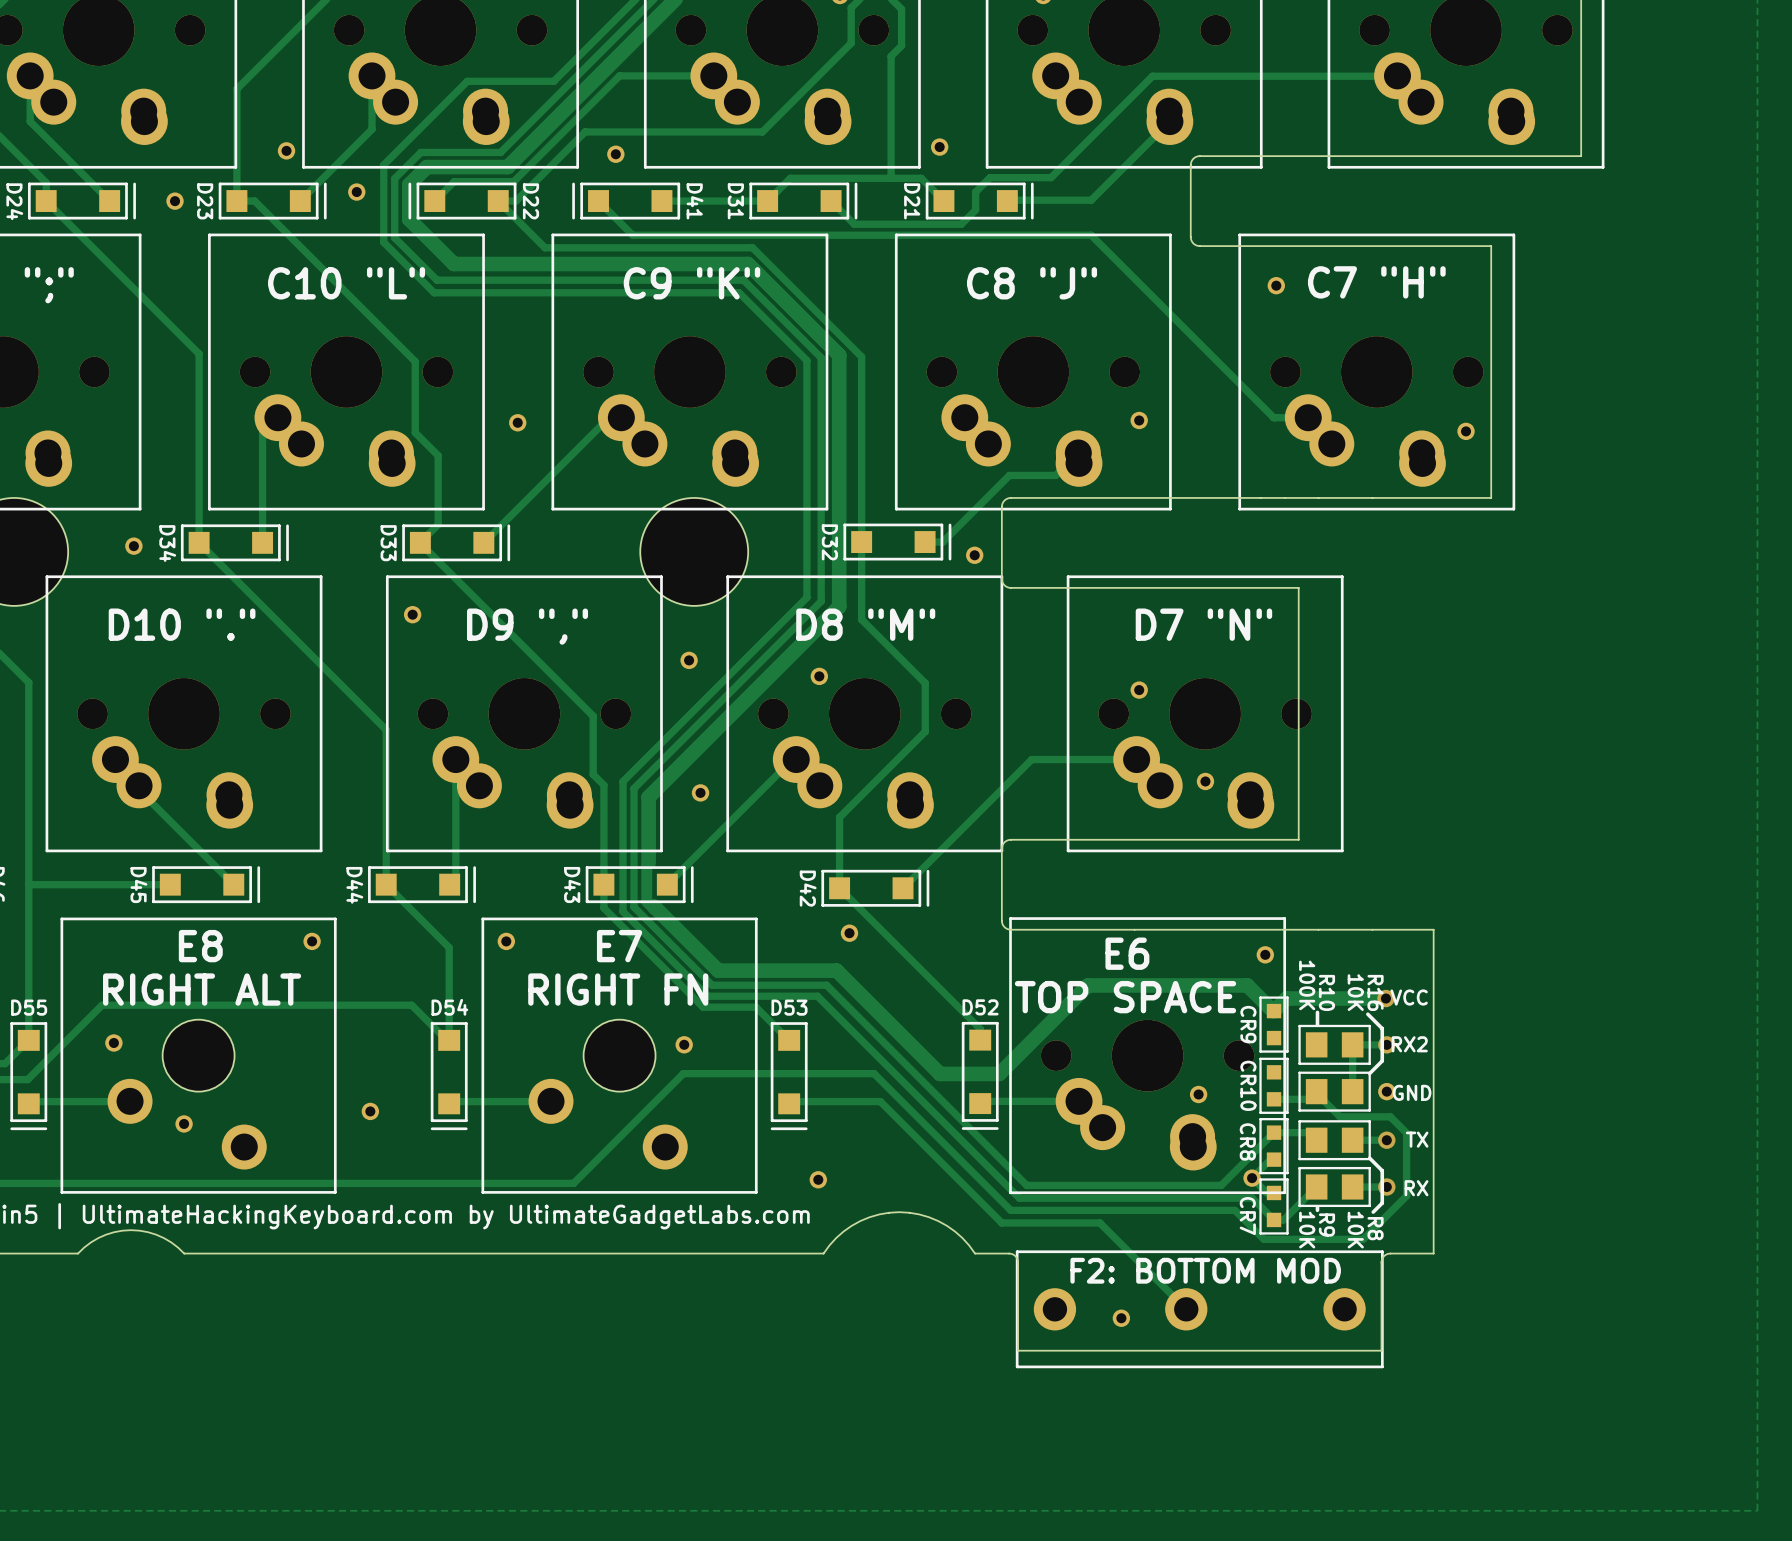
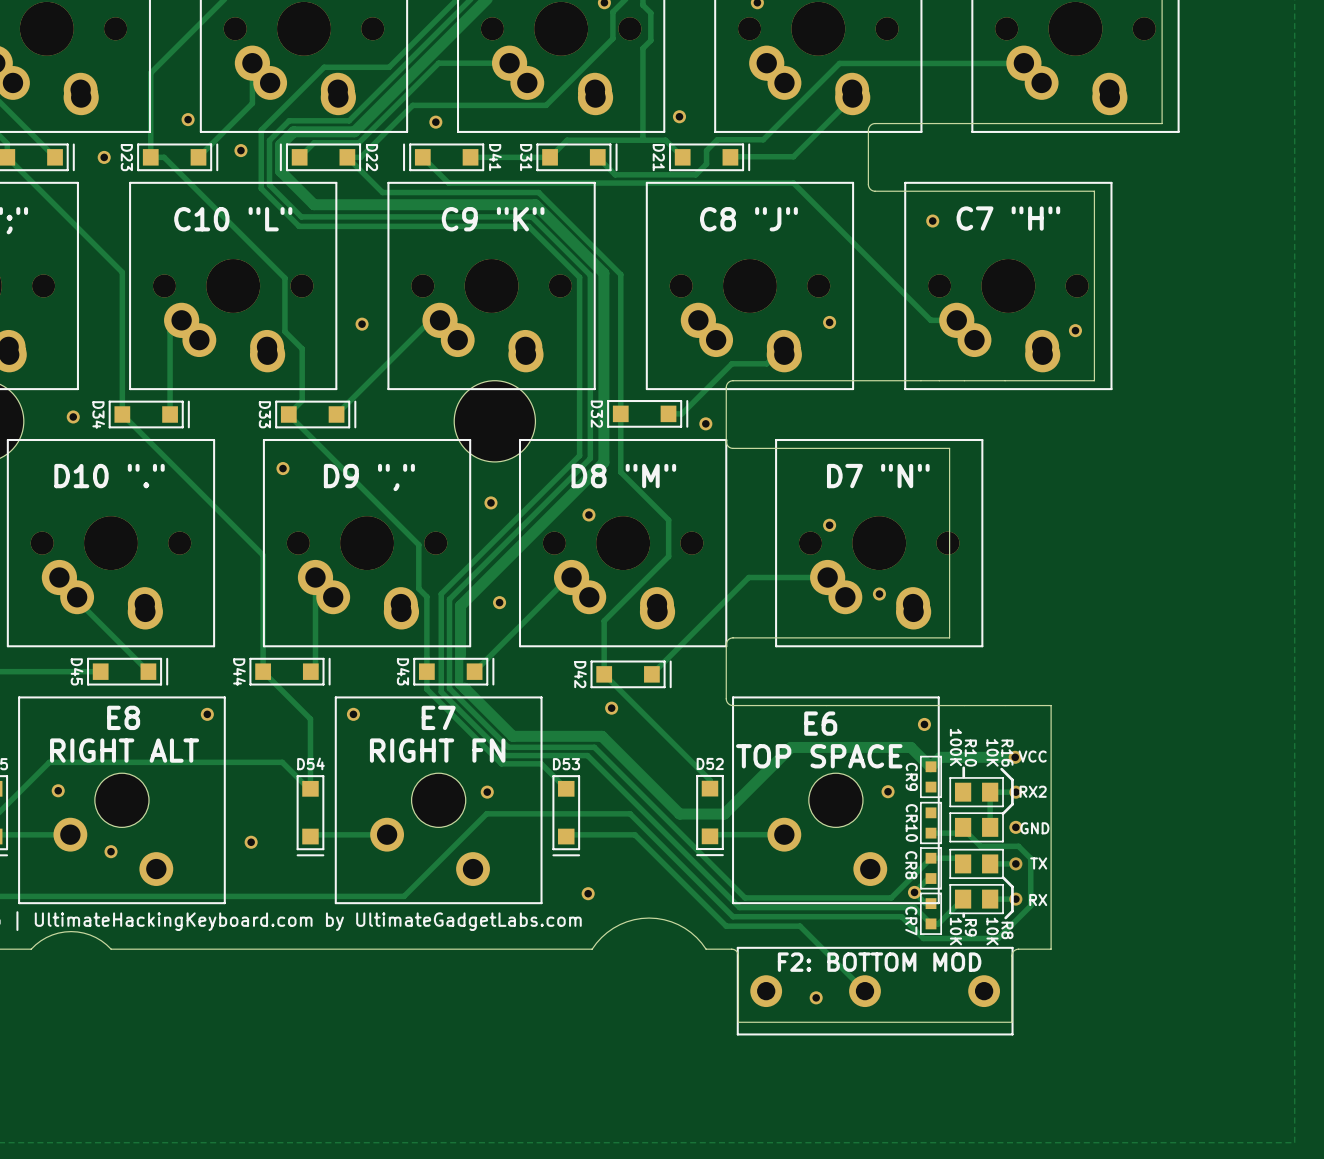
part footprint: [1009, 917, 1287, 1195] -> [732, 696, 940, 905]
part position: (1198, 1094) -> (888, 791)

